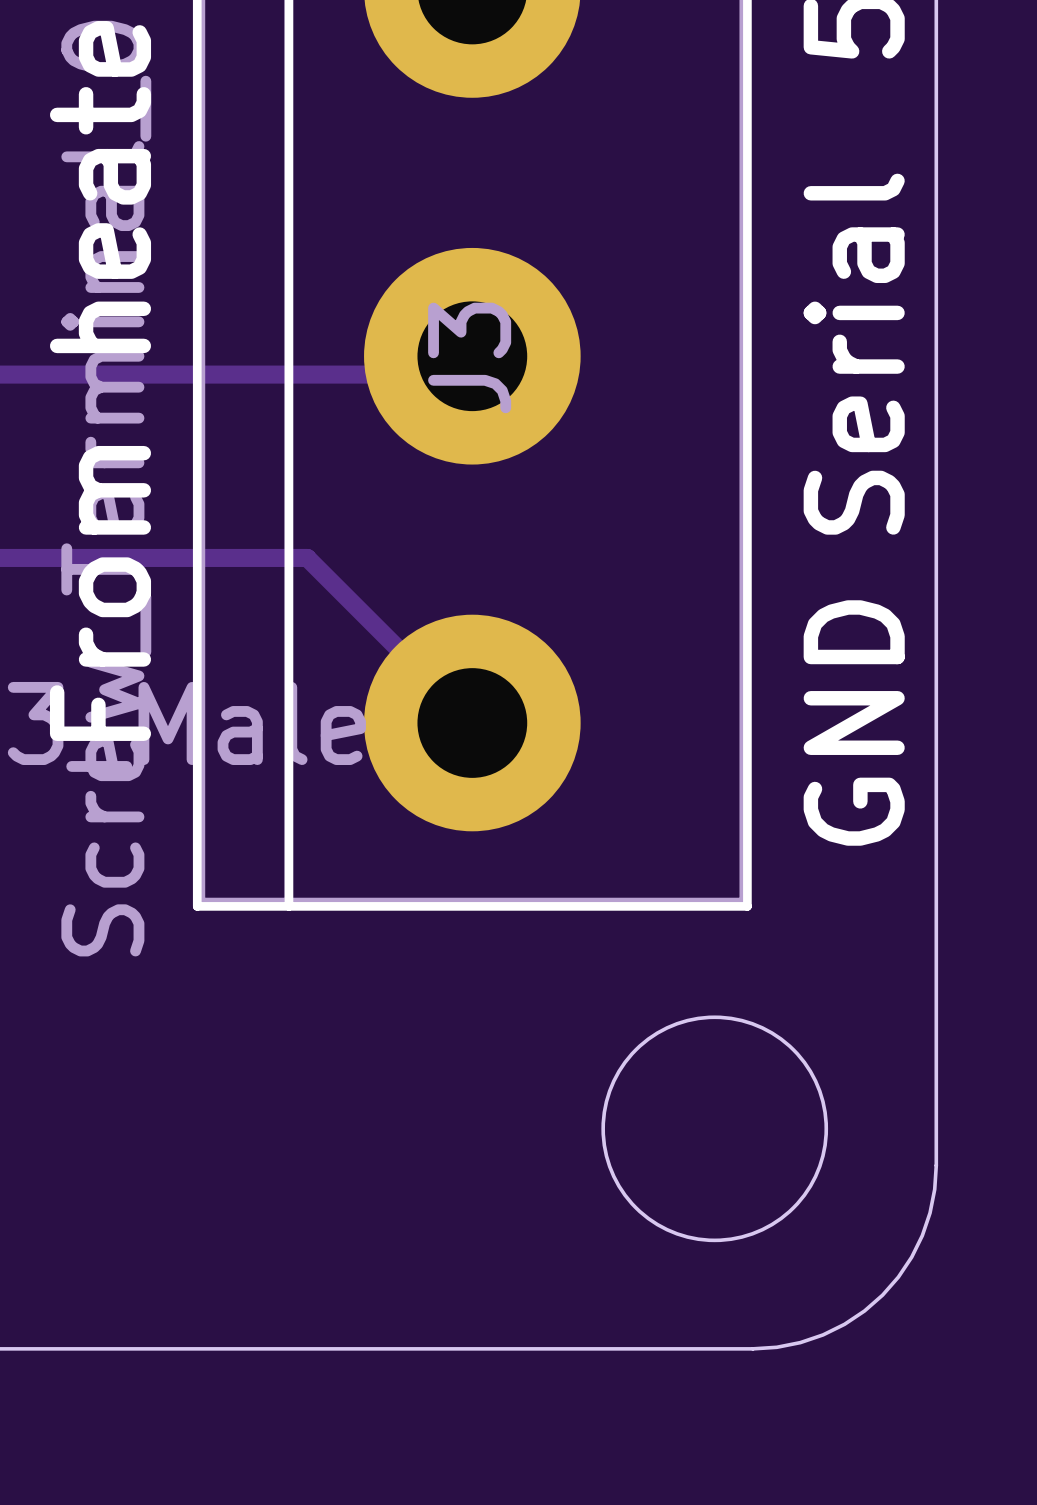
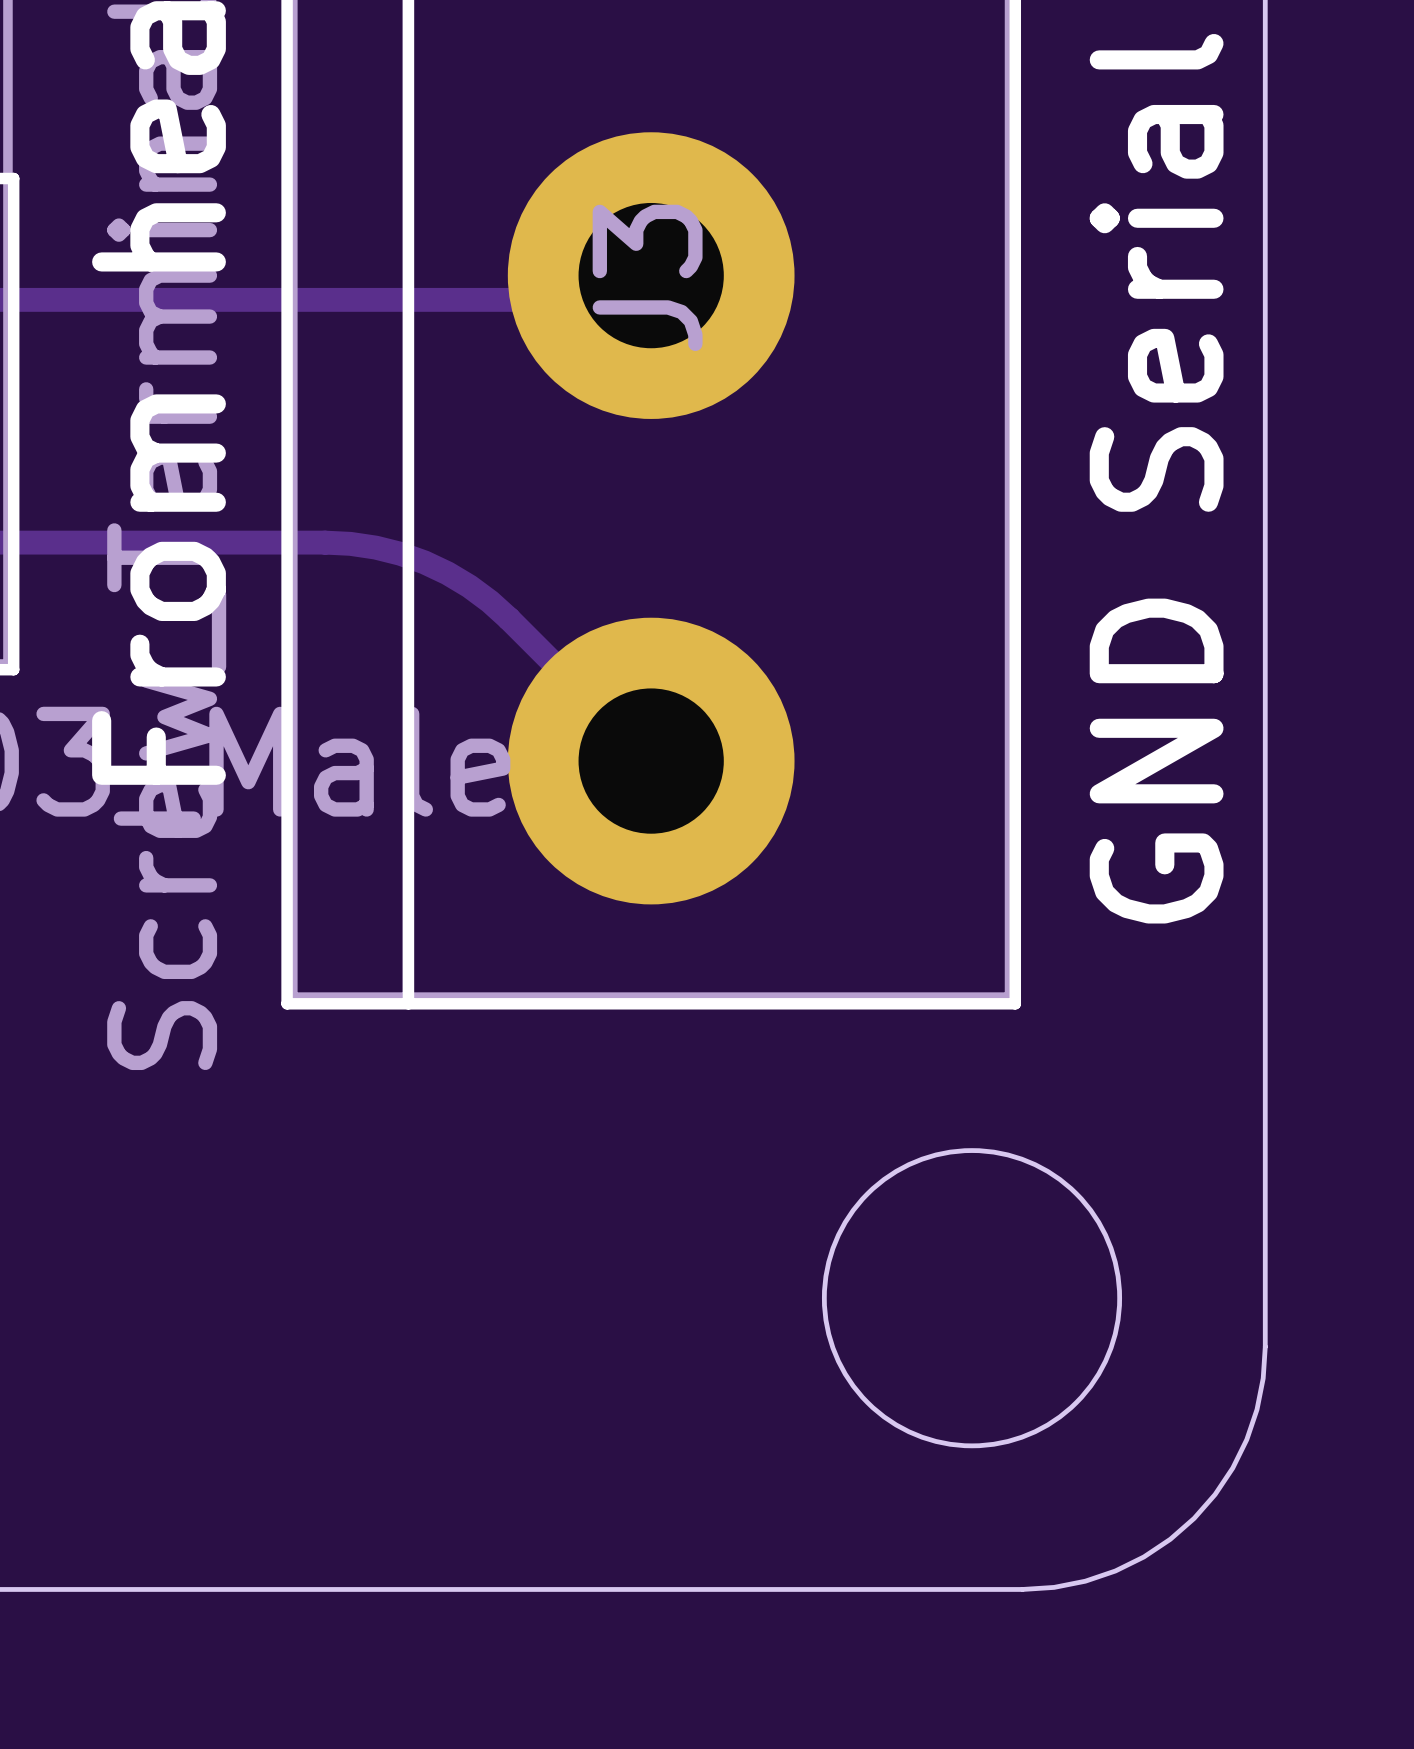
track: (225, 557) (307, 557) (364, 615) -> (325, 542) (375, 547) (424, 562) (469, 586) (508, 618)

